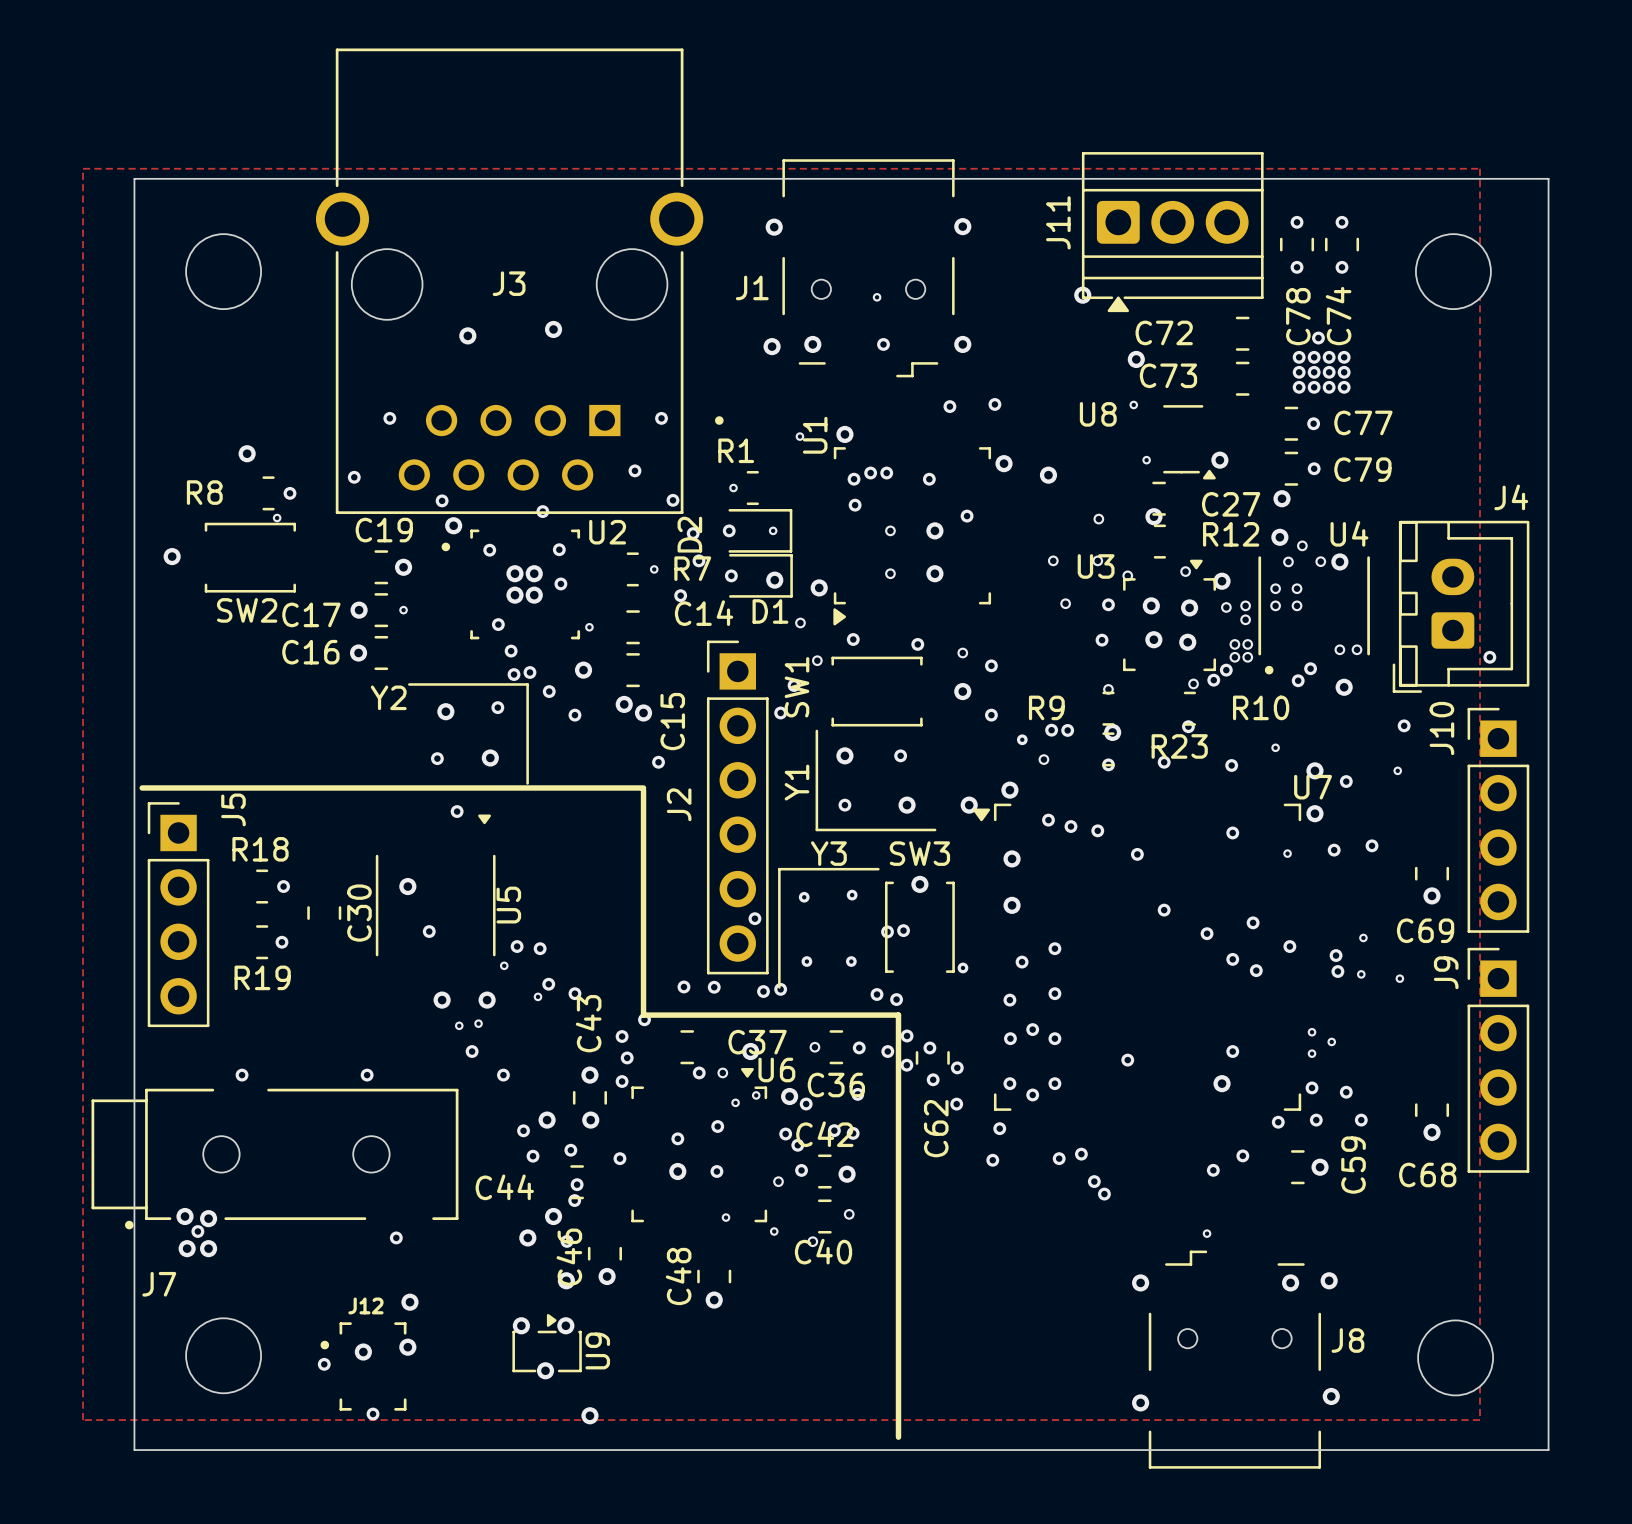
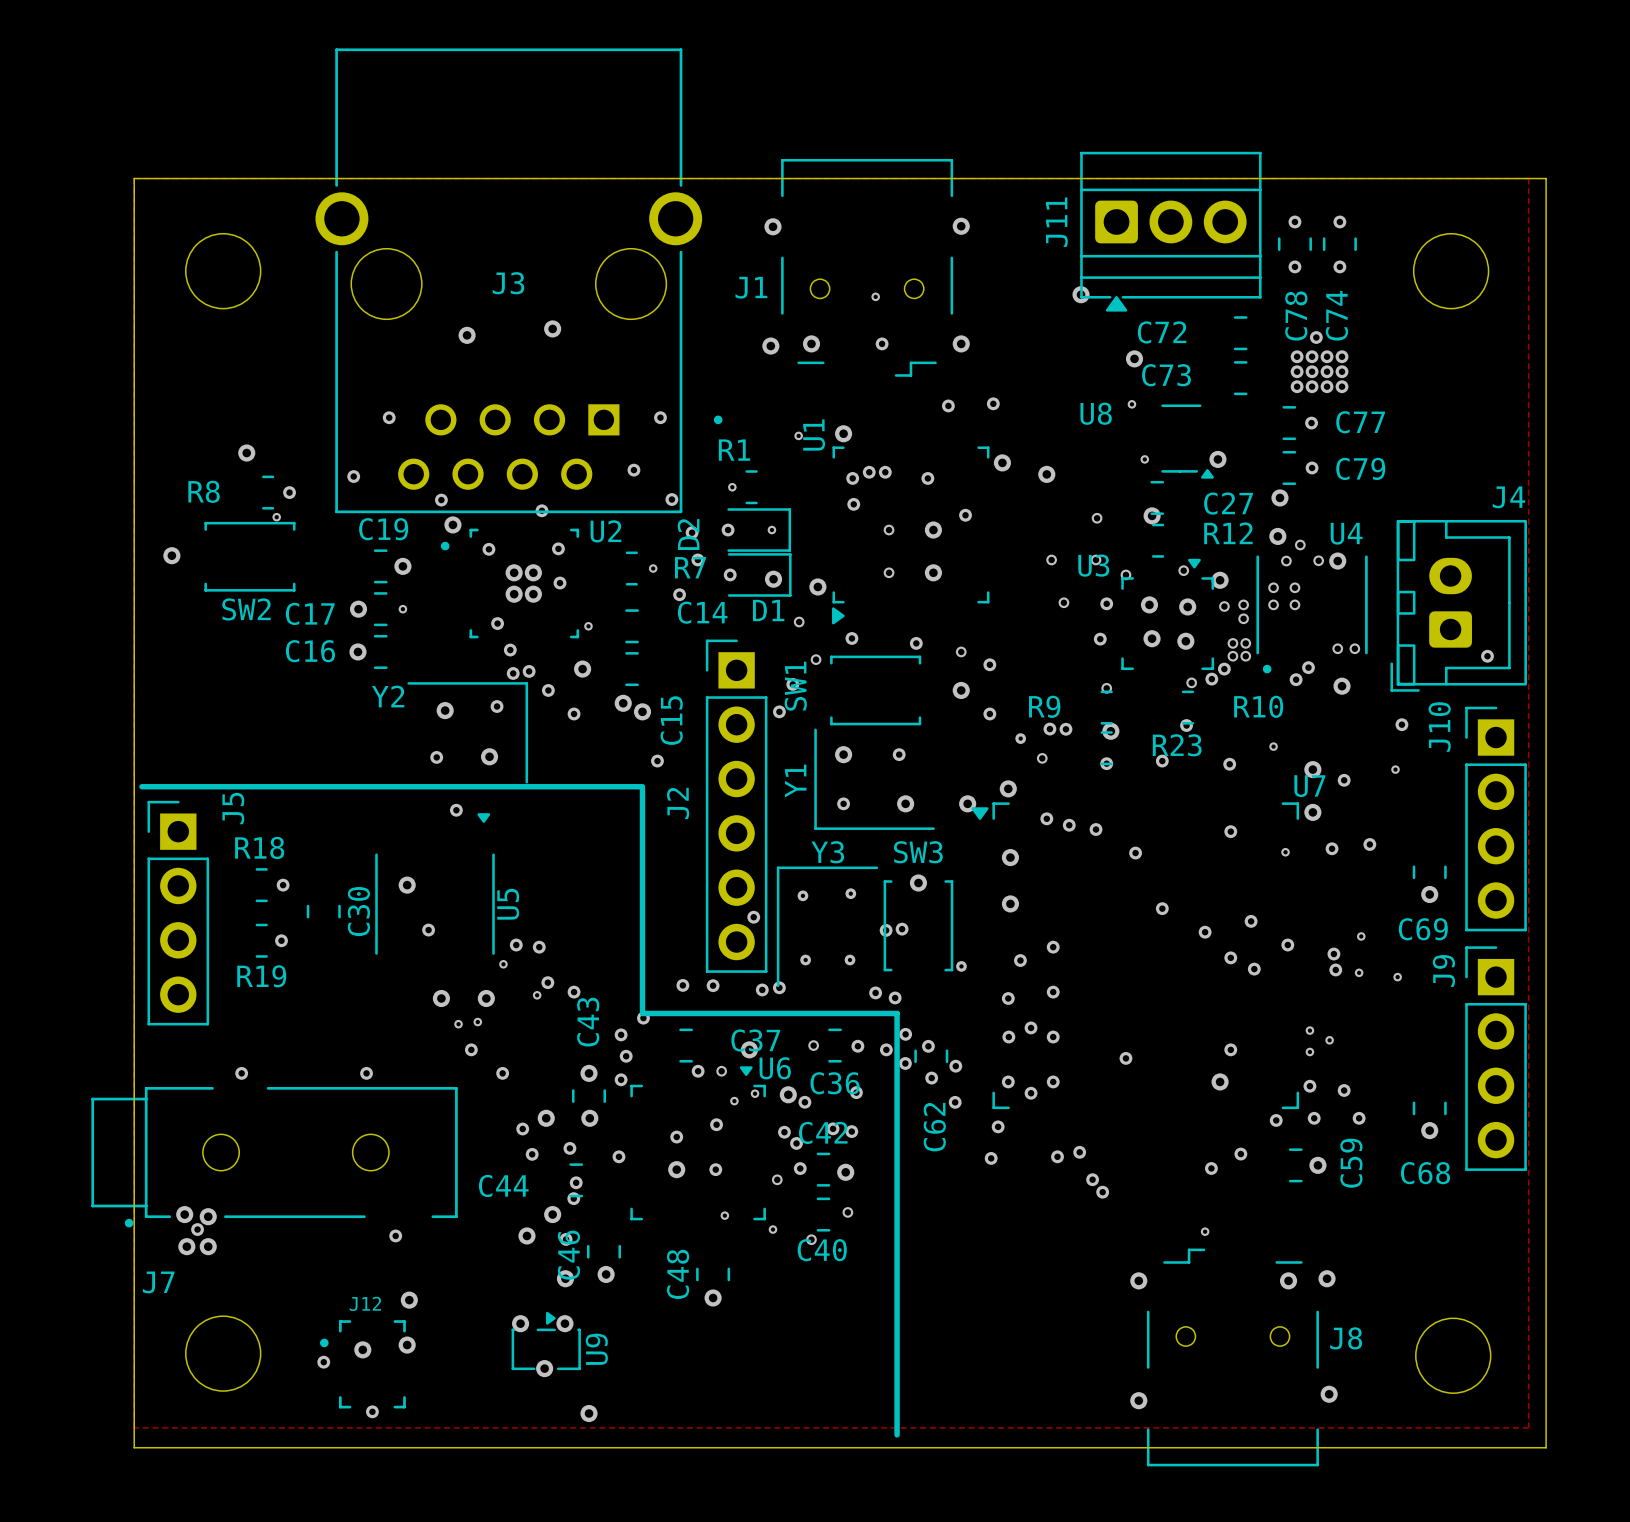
zone outline: (83, 168) (1480, 168) (1480, 1420) (83, 1420) (83, 168) -> (133, 178) (1528, 178) (1528, 1427) (133, 1427) (133, 178)

